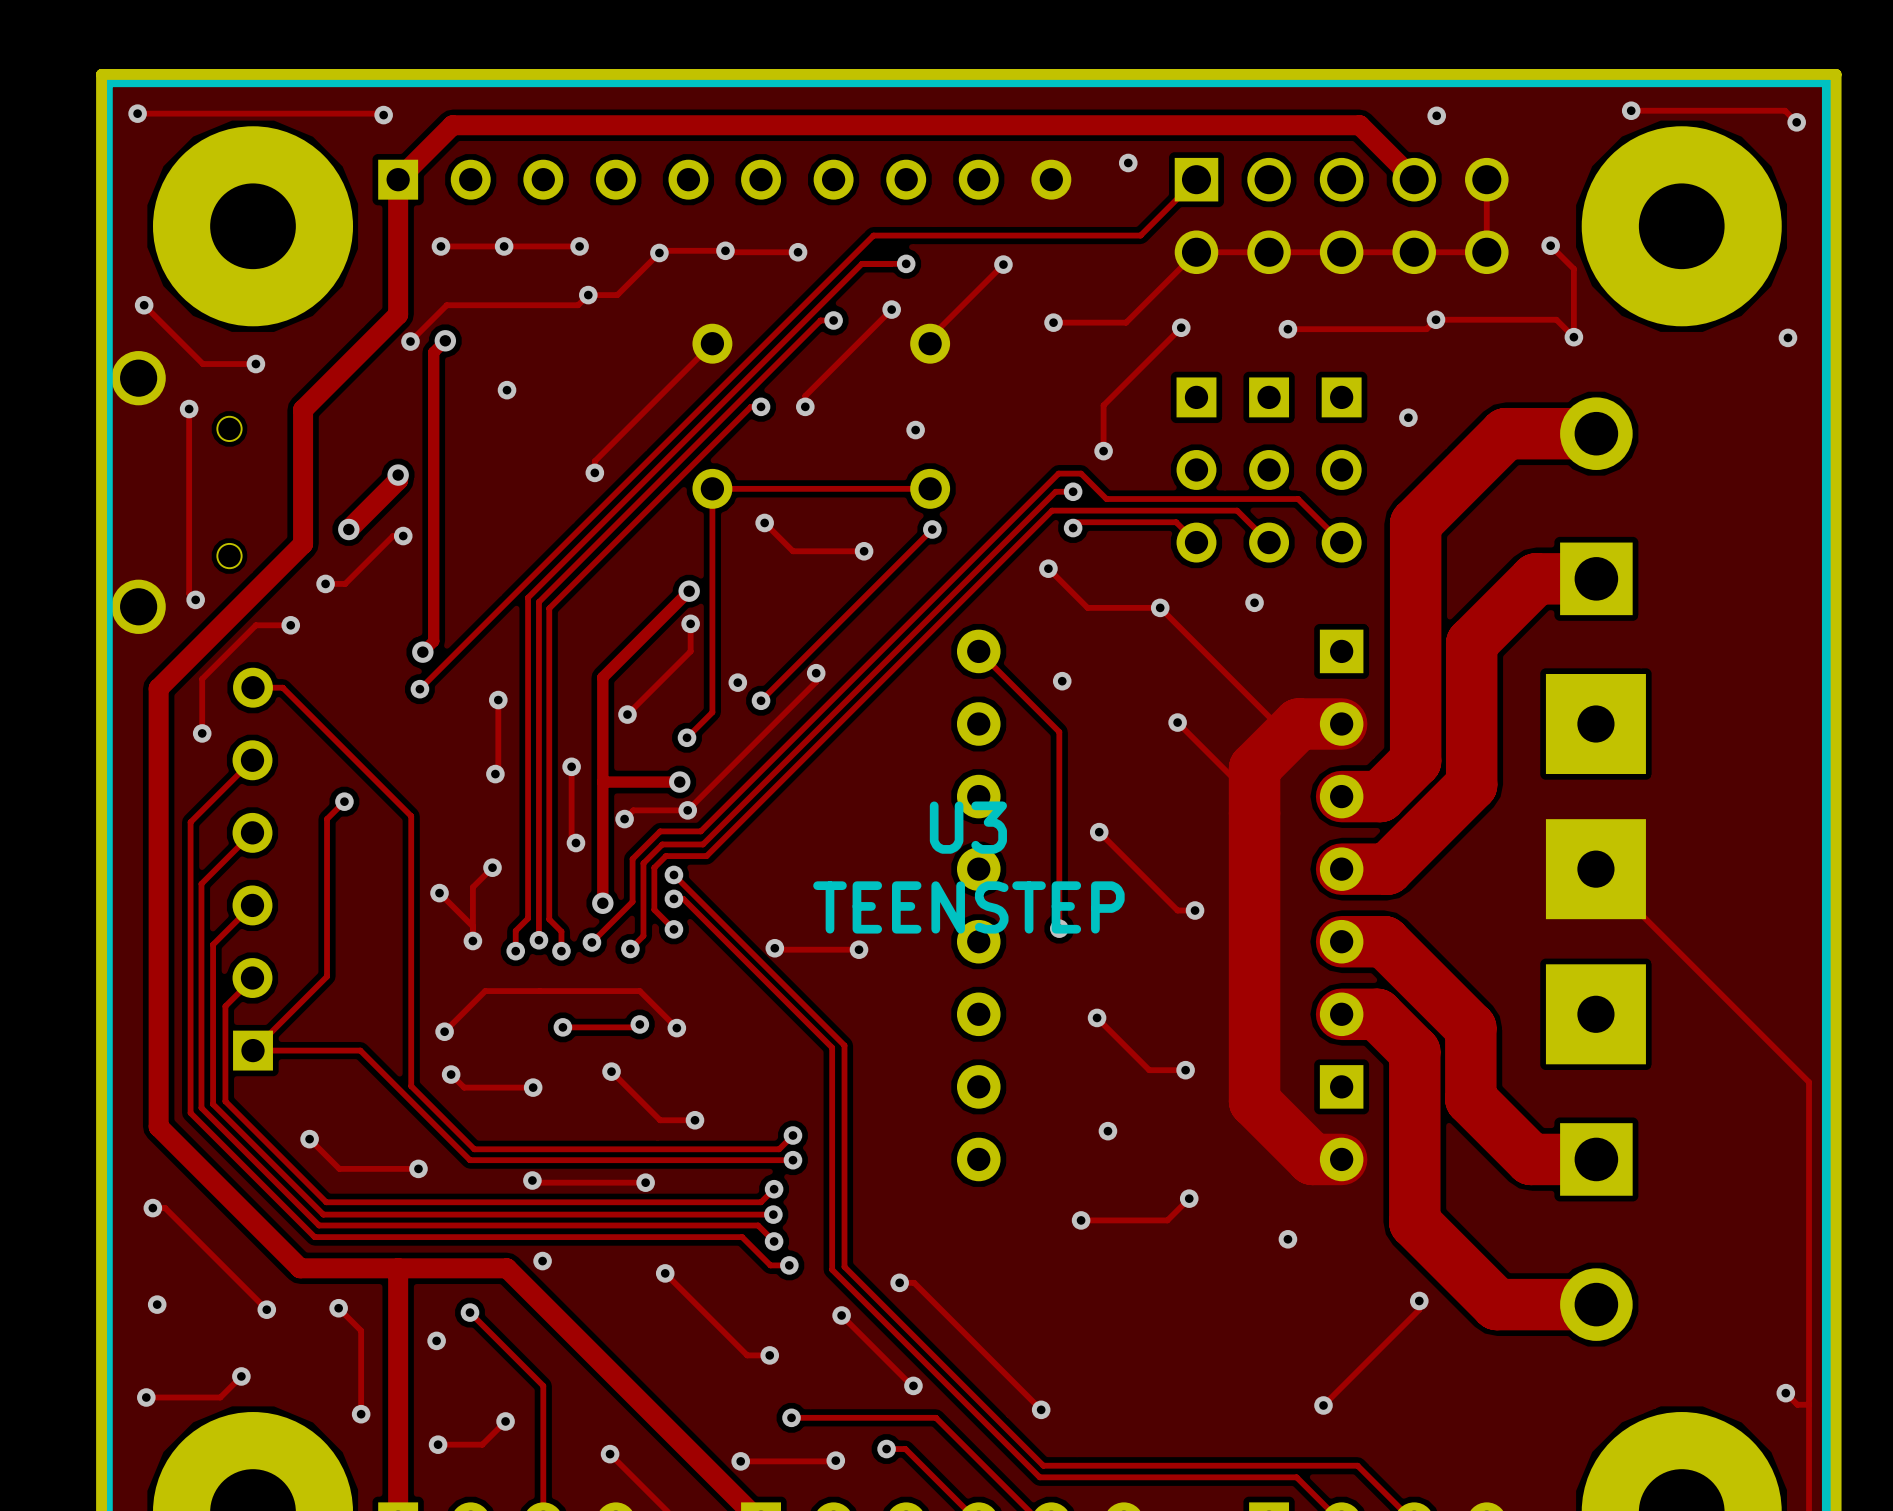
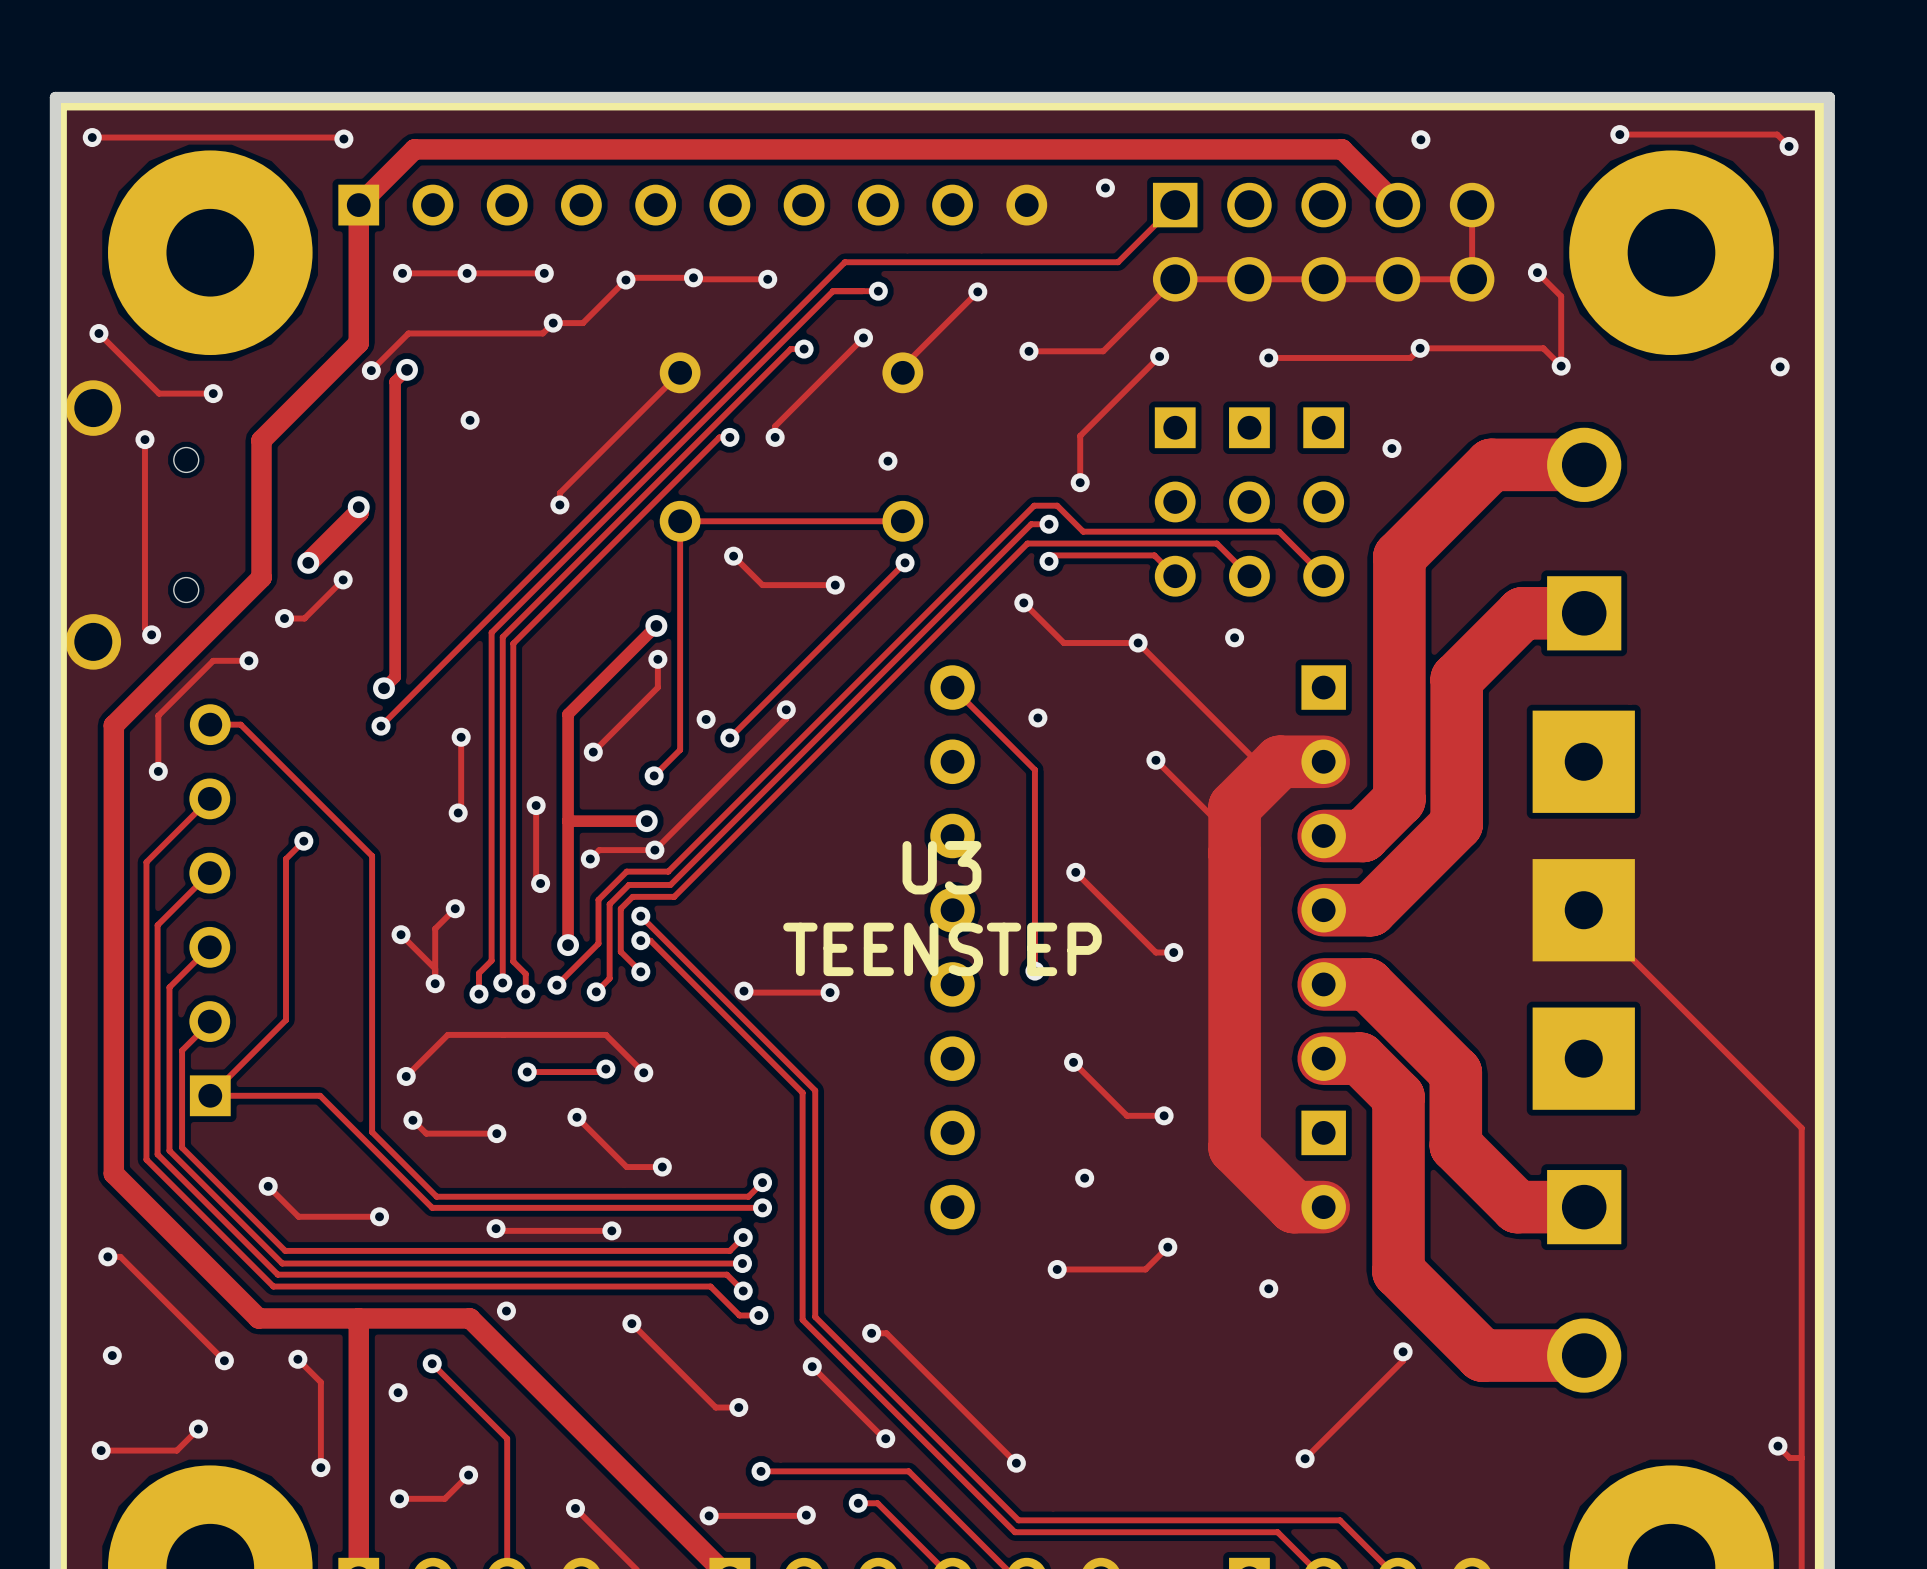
track: (403, 536) (393, 536) (382, 546) -> none
via position: (403, 536) -> (343, 579)

